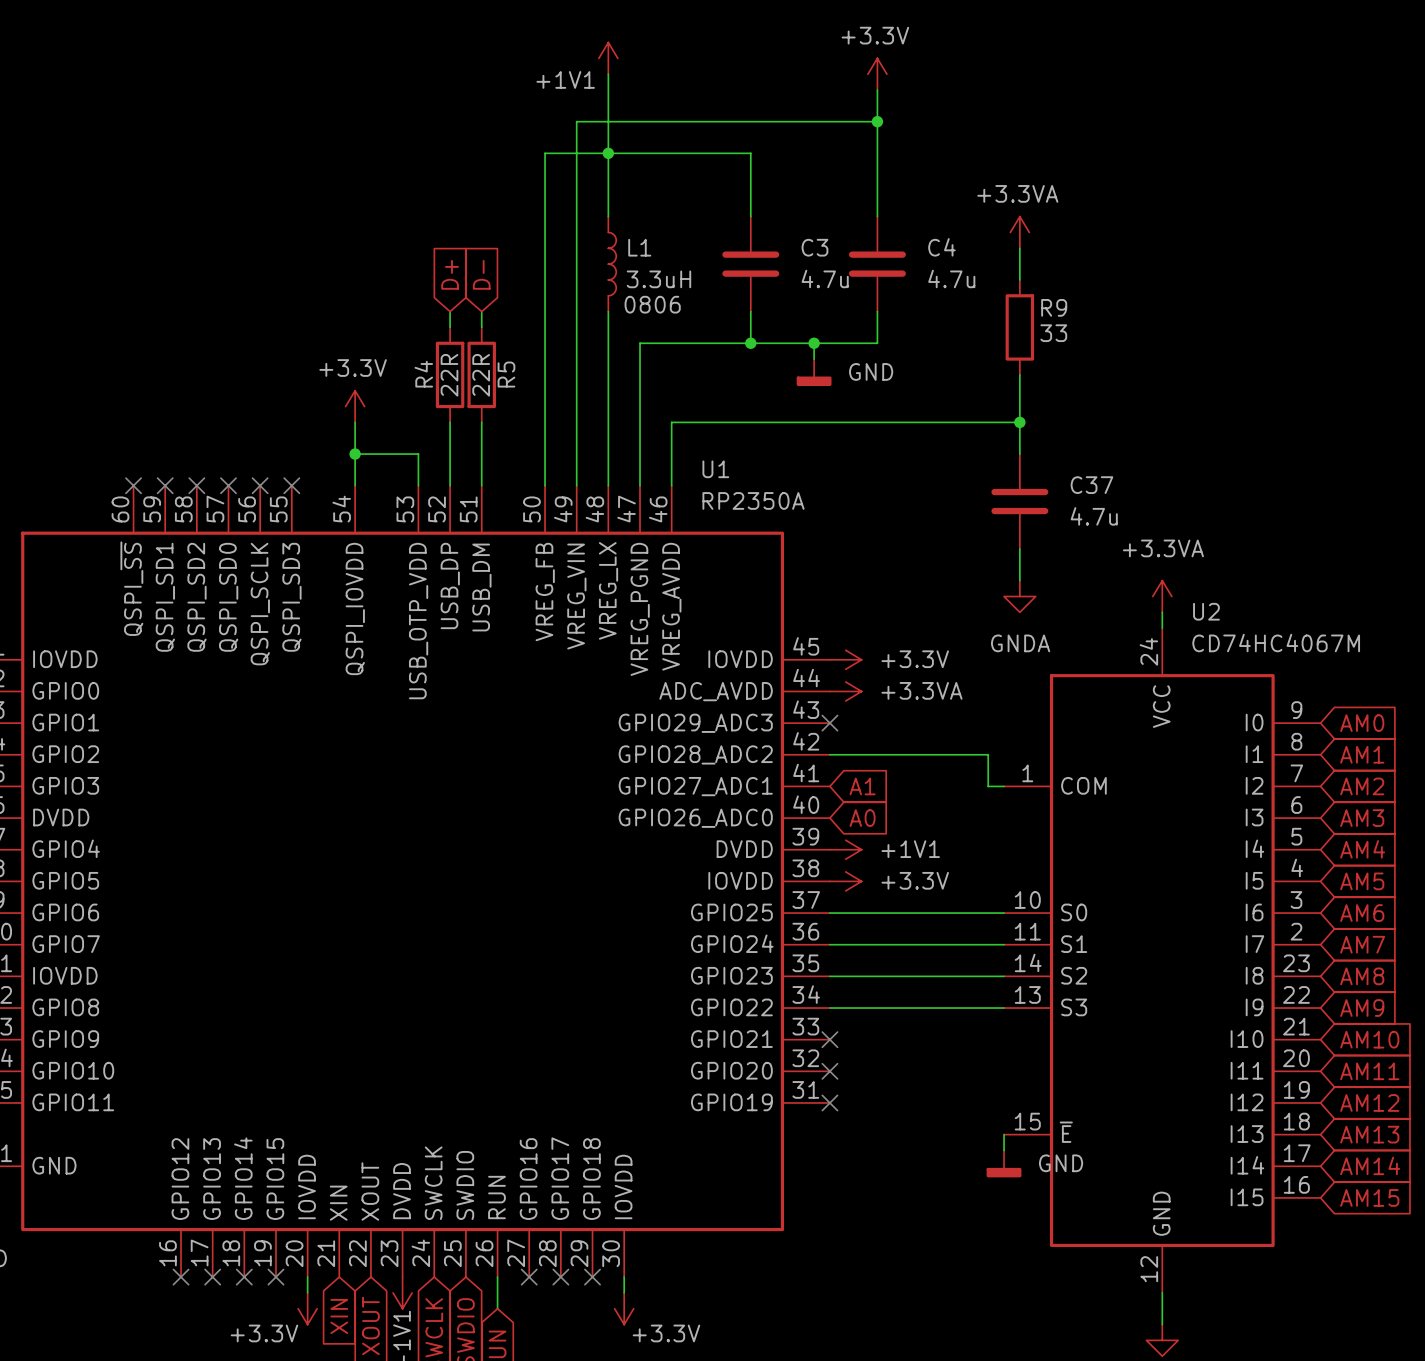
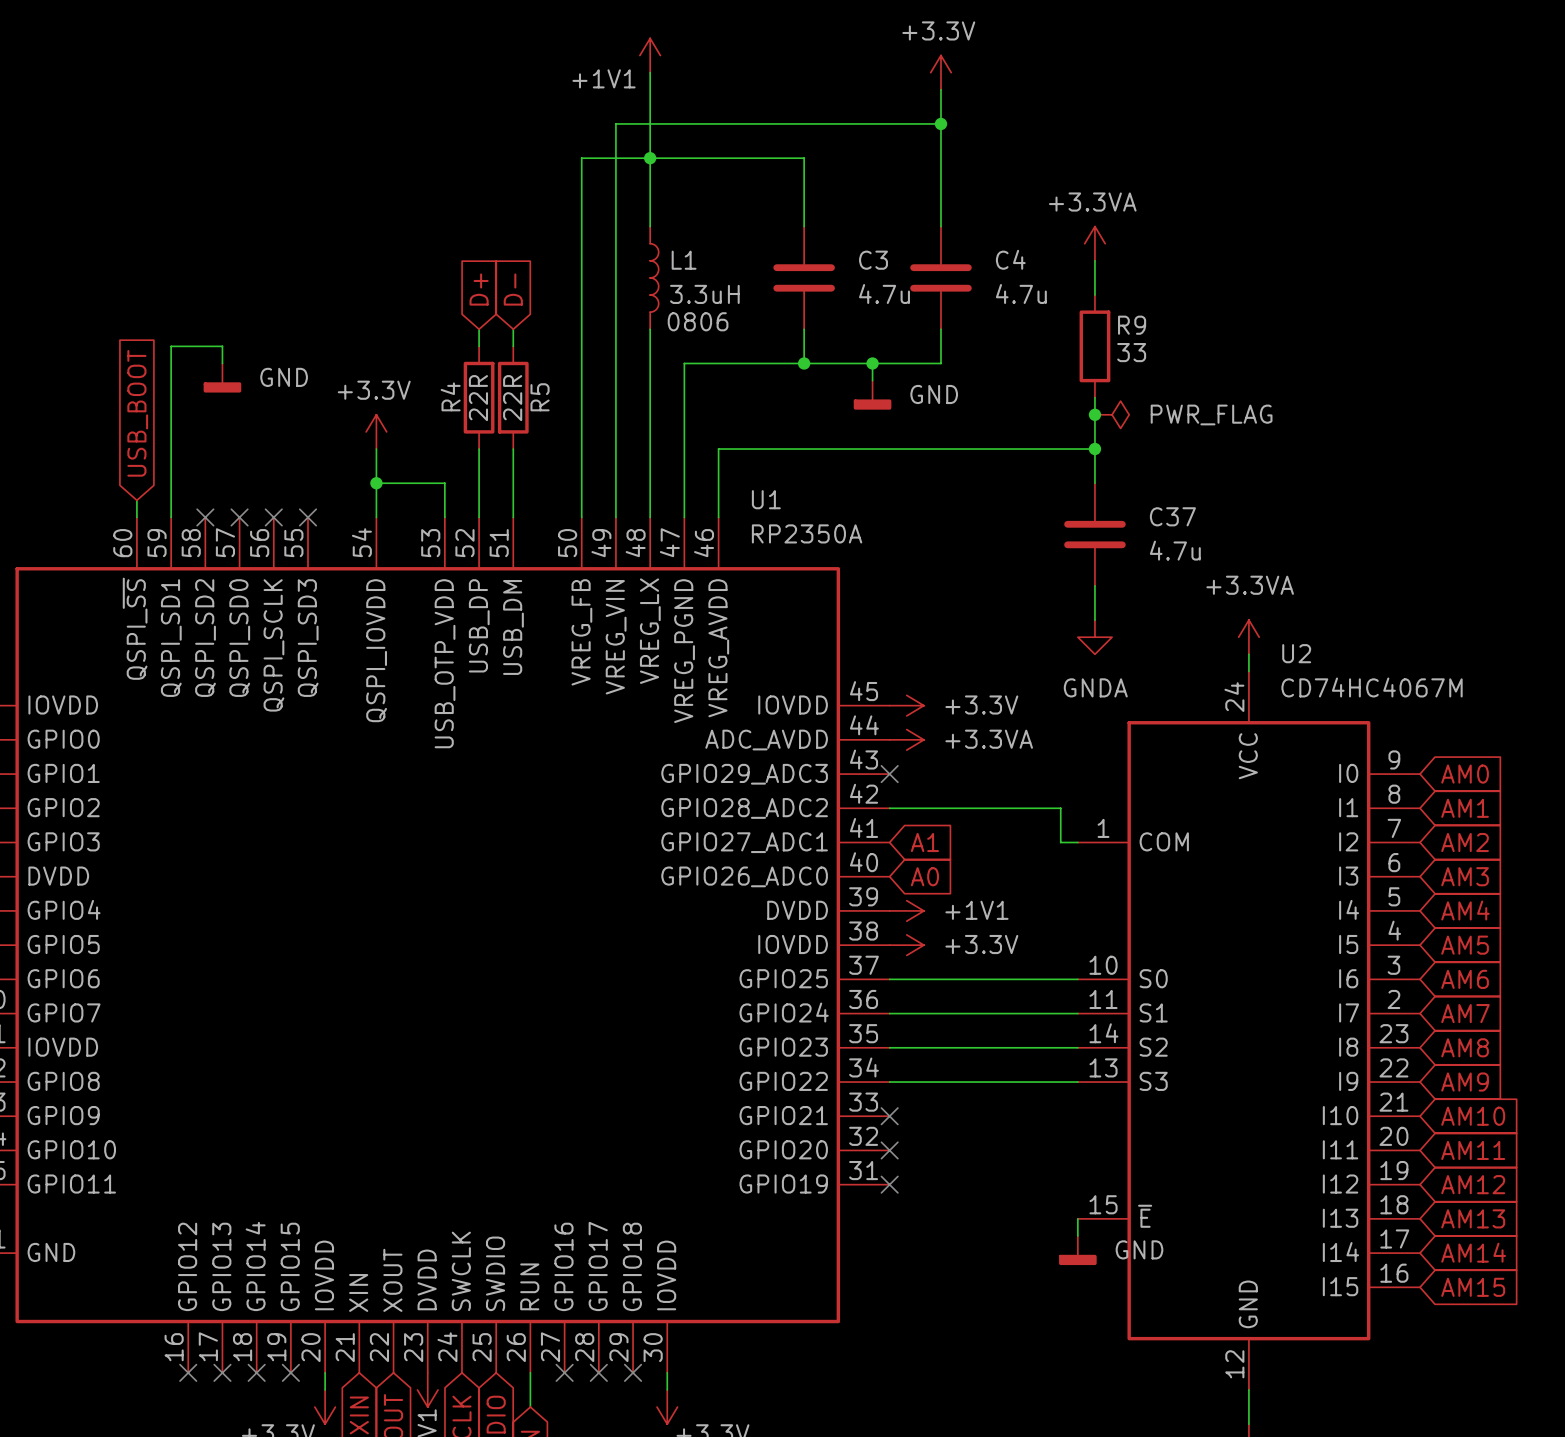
wire: none -> (222, 363) (222, 346) (171, 346) (171, 517)
power symbol: none -> GND (222, 378)
global label: none -> USB_BOOT (137, 413)
junction: none -> (1094, 414)
power symbol: none -> PWR_FLAG (1112, 414)
wire: none -> (136, 500) (136, 517)
no-connect mark: (133, 485) -> none
no-connect mark: (165, 485) -> none

